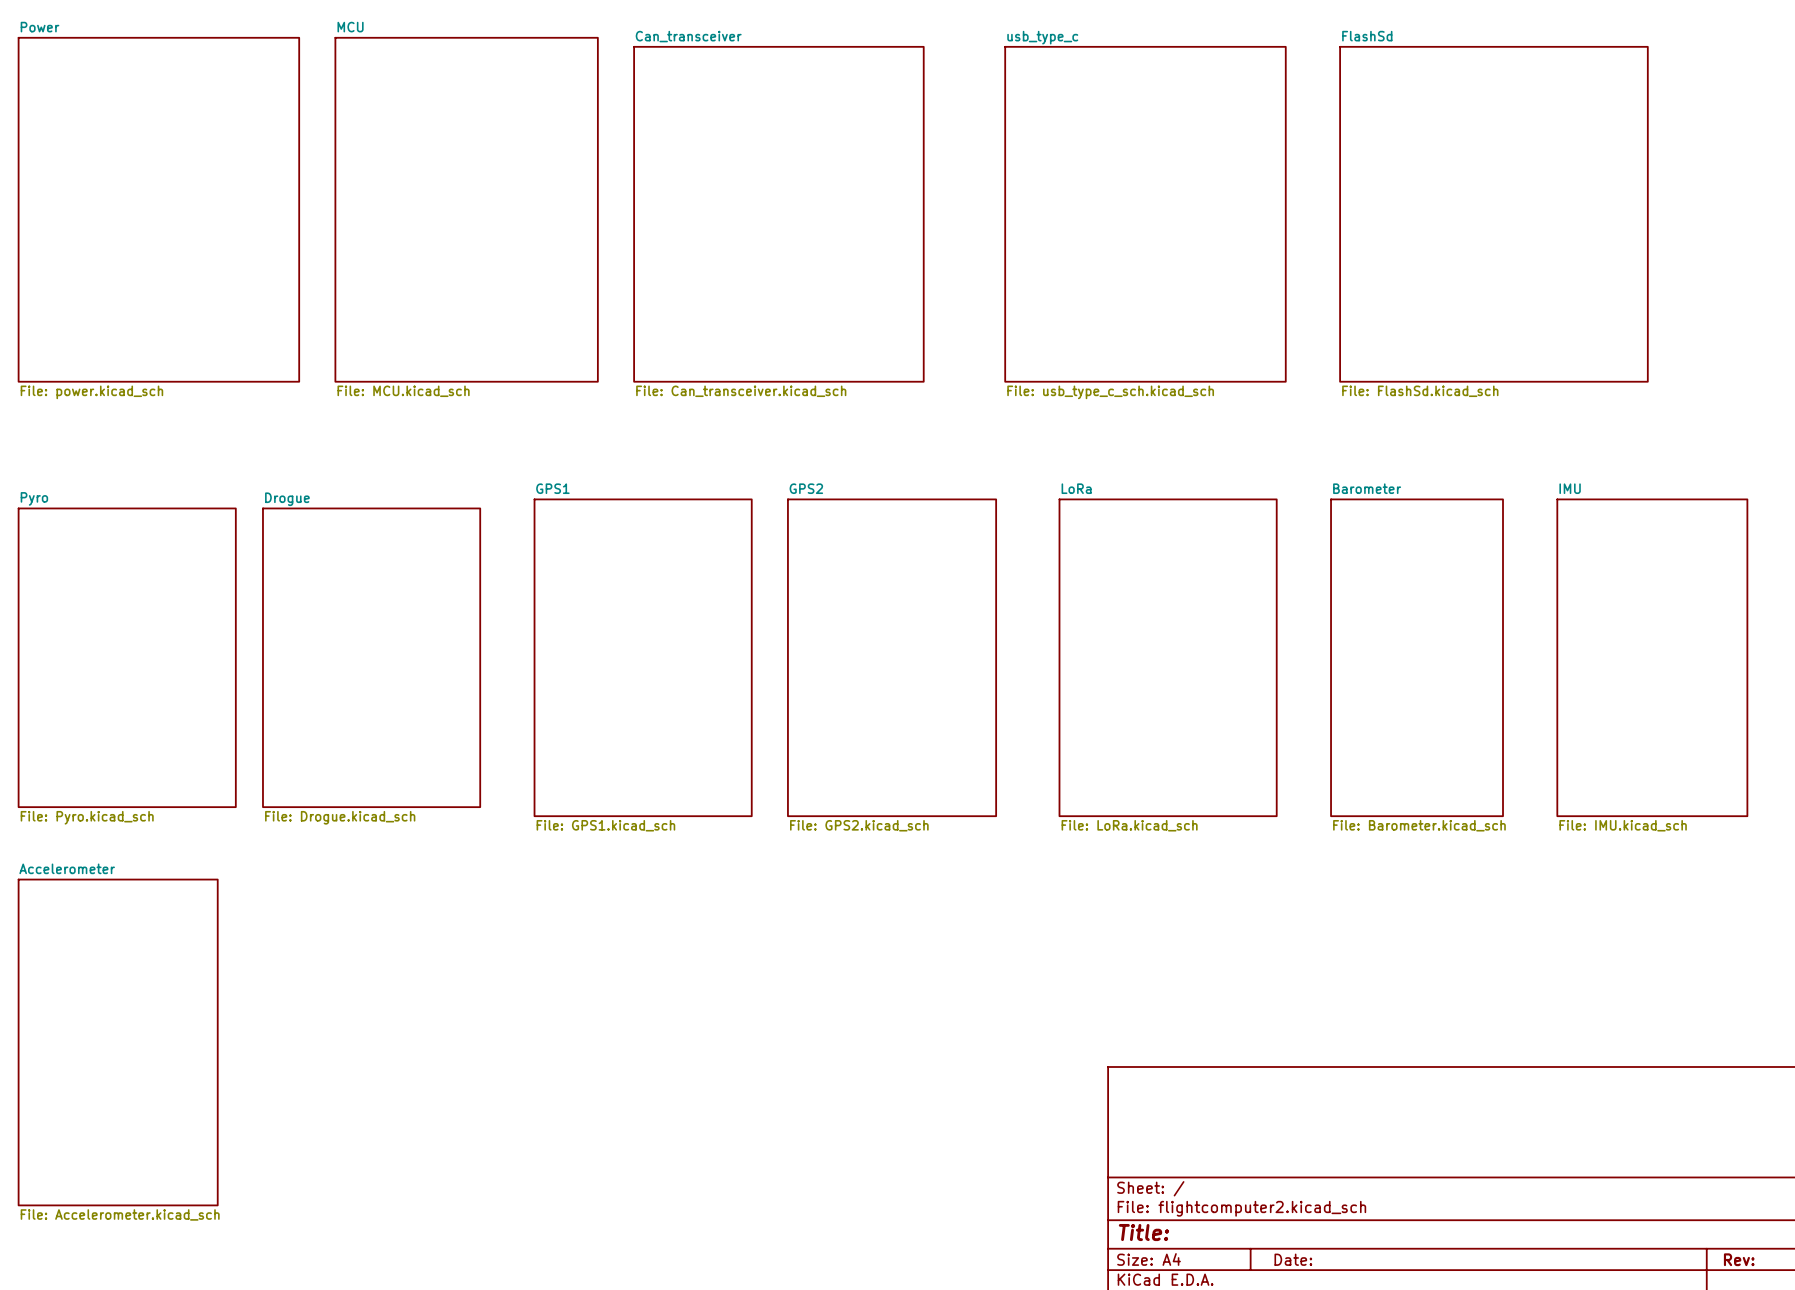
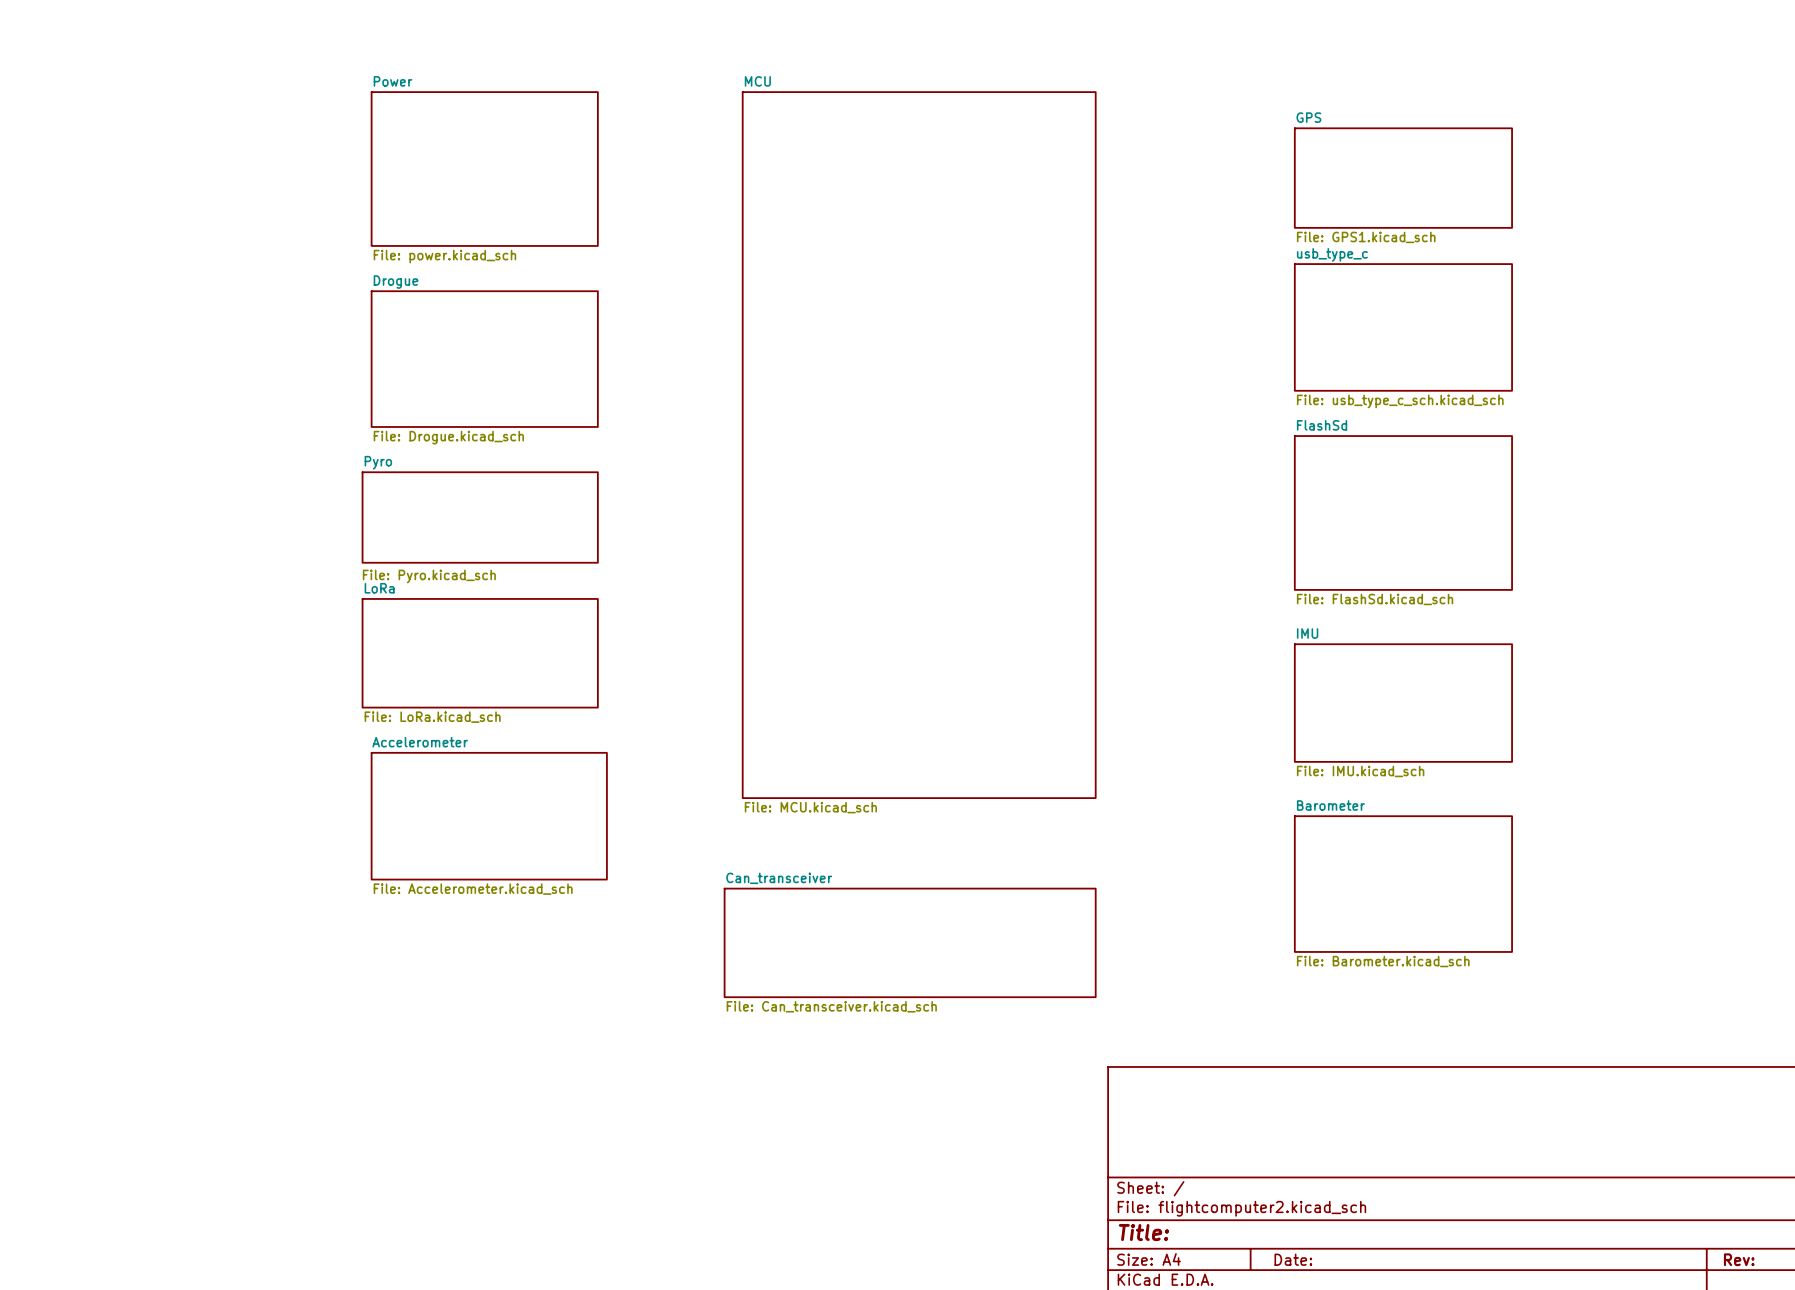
sheet Power: none -> File: power.kicad_sch (484, 169)
sheet GPS: none -> File: GPS1.kicad_sch (1403, 178)
sheet Power: File: power.kicad_sch (158, 209) -> none
sheet MCU: File: MCU.kicad_sch (466, 209) -> none
sheet Can_transceiver: File: Can_transceiver.kicad_sch (778, 214) -> none
sheet usb_type_c: File: usb_type_c_sch.kicad_sch (1145, 214) -> none
sheet FlashSd: File: FlashSd.kicad_sch (1493, 214) -> none
sheet usb_type_c: none -> File: usb_type_c_sch.kicad_sch (1403, 327)
sheet Drogue: none -> File: Drogue.kicad_sch (484, 359)
sheet MCU: none -> File: MCU.kicad_sch (919, 445)
sheet FlashSd: none -> File: FlashSd.kicad_sch (1403, 512)
sheet Pyro: none -> File: Pyro.kicad_sch (480, 517)
sheet LoRa: none -> File: LoRa.kicad_sch (480, 653)
sheet Pyro: File: Pyro.kicad_sch (127, 657) -> none
sheet Drogue: File: Drogue.kicad_sch (371, 657) -> none
sheet GPS1: File: GPS1.kicad_sch (643, 657) -> none
sheet GPS2: File: GPS2.kicad_sch (892, 657) -> none
sheet LoRa: File: LoRa.kicad_sch (1168, 657) -> none
sheet Barometer: File: Barometer.kicad_sch (1417, 657) -> none
sheet IMU: File: IMU.kicad_sch (1652, 657) -> none
sheet IMU: none -> File: IMU.kicad_sch (1403, 703)
sheet Accelerometer: none -> File: Accelerometer.kicad_sch (489, 816)
sheet Barometer: none -> File: Barometer.kicad_sch (1403, 884)
sheet Can_transceiver: none -> File: Can_transceiver.kicad_sch (910, 942)
sheet Accelerometer: File: Accelerometer.kicad_sch (118, 1042) -> none

